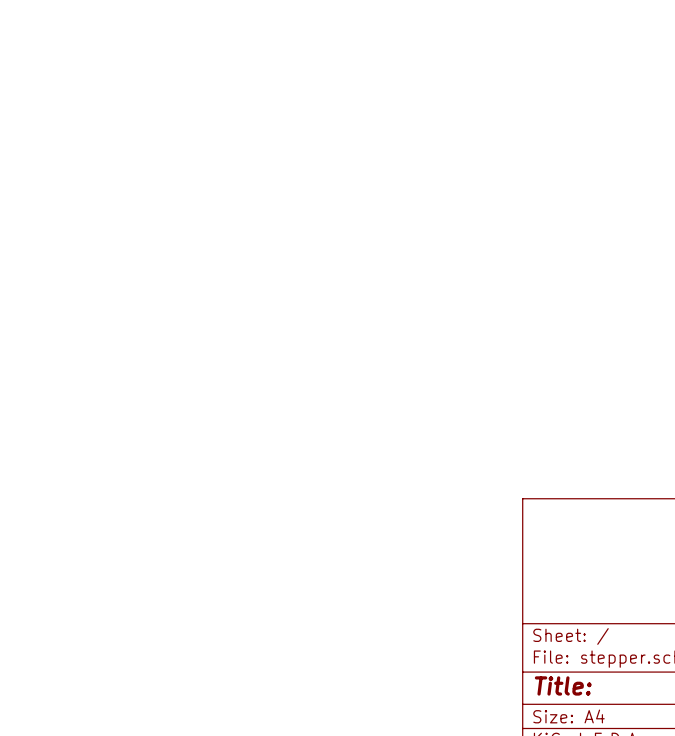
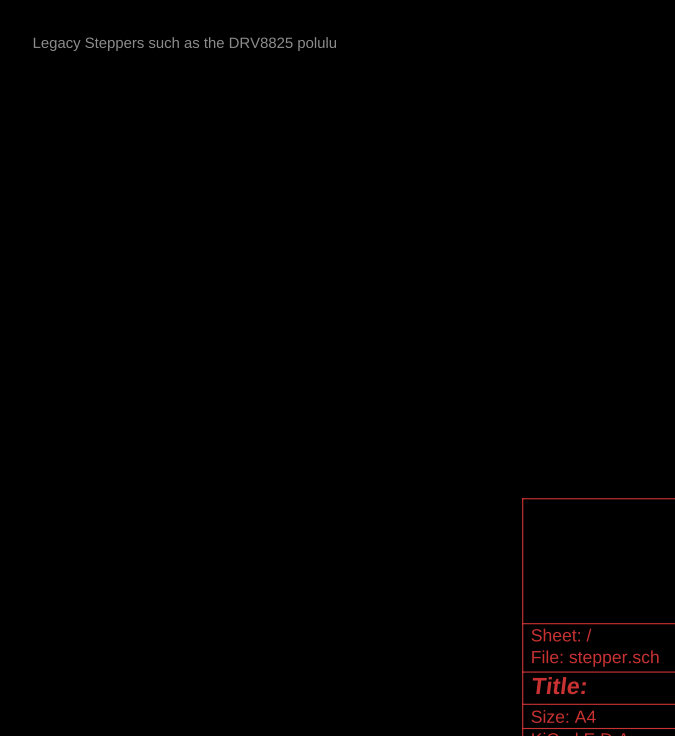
text: none -> Legacy Steppers such as the DRV8825 polulu (184, 44)

